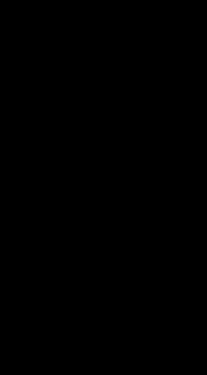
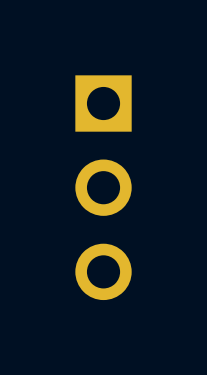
part: none -> (103, 187)

